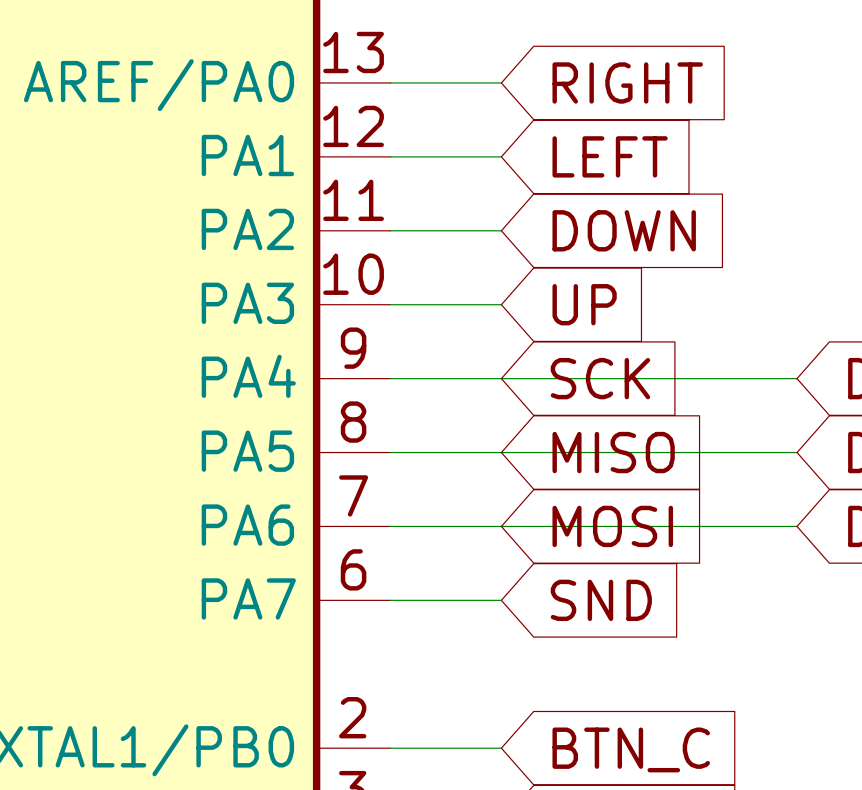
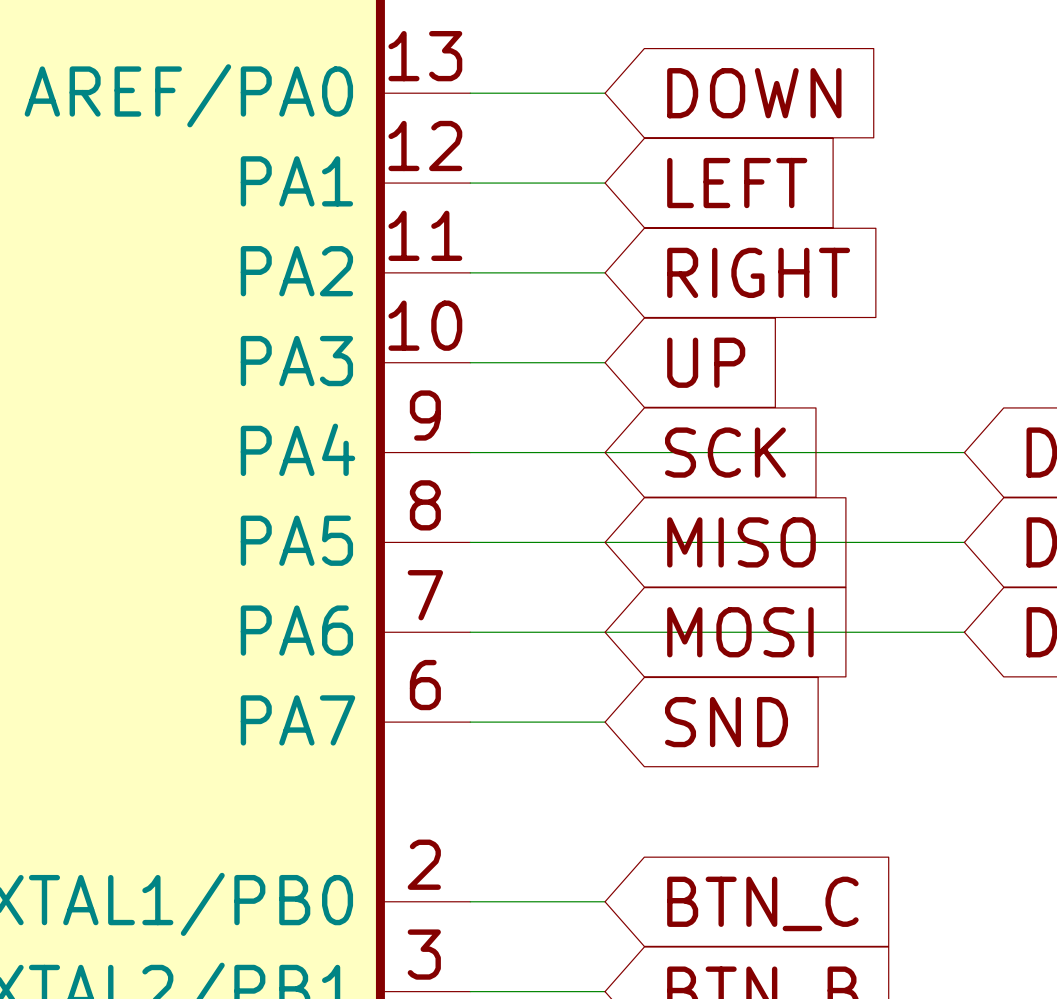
global label: RIGHT (627, 82) -> DOWN (754, 93)
global label: DOWN (624, 230) -> RIGHT (758, 272)

